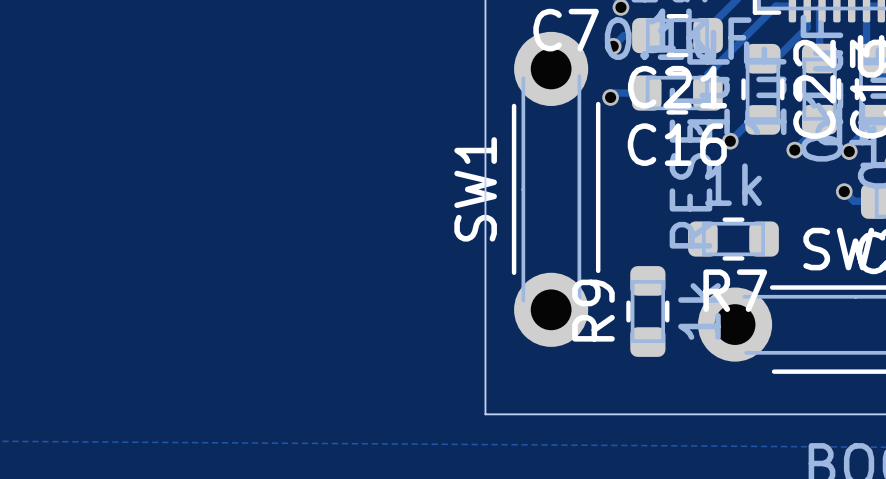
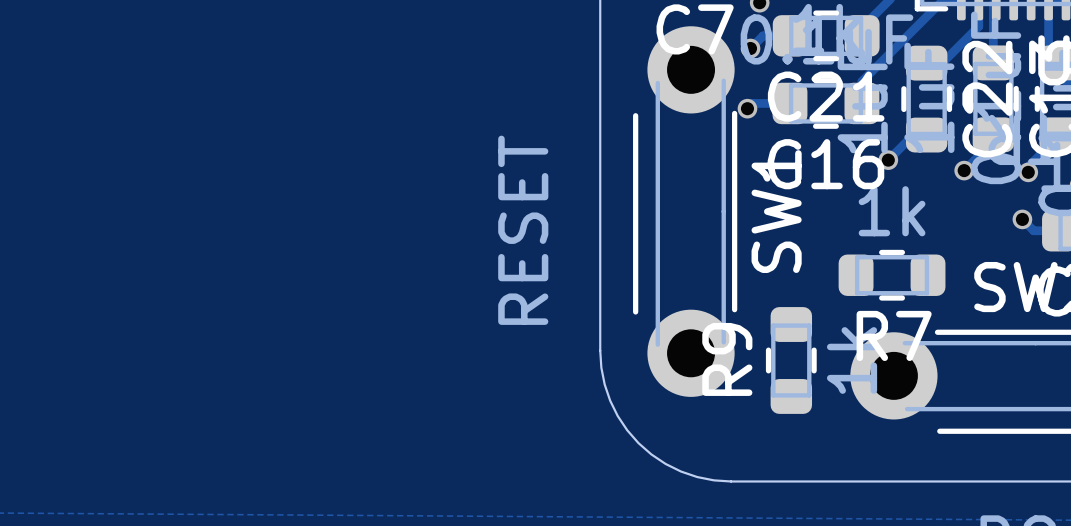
SW1 rotation: 0° (556, 189) -> 180° (685, 211)
board edge: (485, 303) (485, 414) (596, 414) -> (600, 350) (604, 384) (610, 400) (617, 416) (638, 443) (665, 463) (680, 471) (713, 480) (731, 481)

